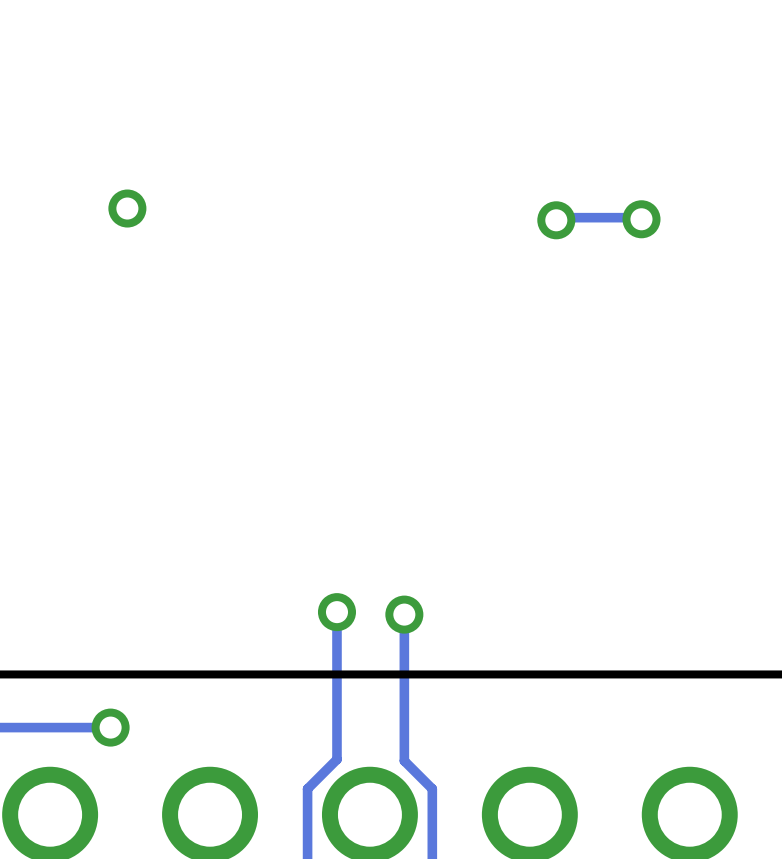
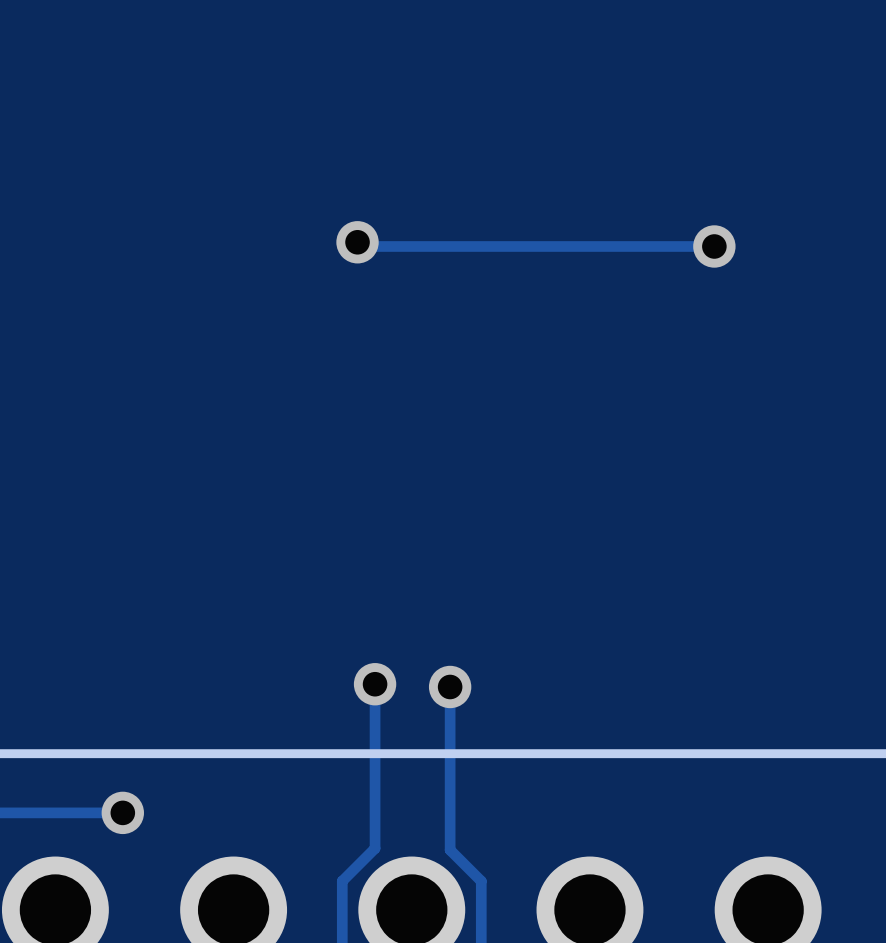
via: (127, 208) -> none
via: none -> (357, 242)
track: (641, 219) (639, 217) (558, 217) (556, 220) -> (714, 246) (361, 246) (357, 242)
via: (556, 220) -> none

